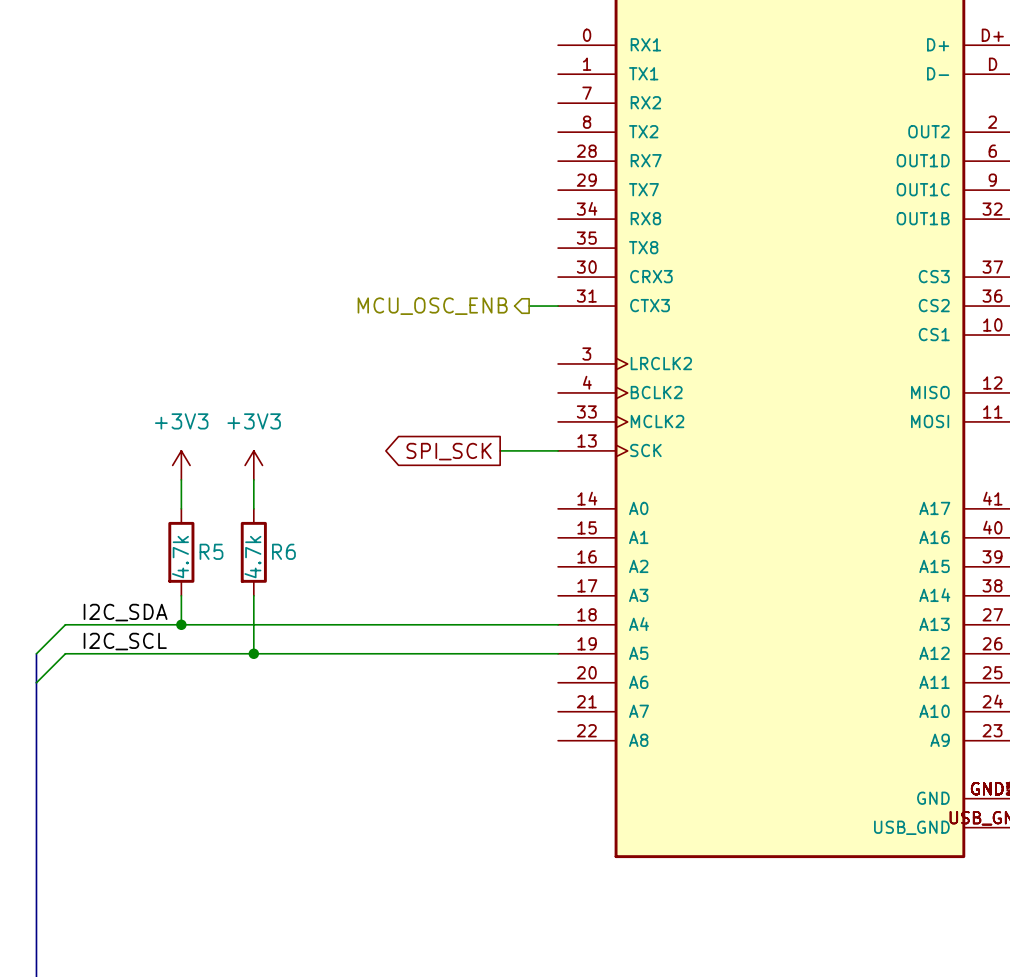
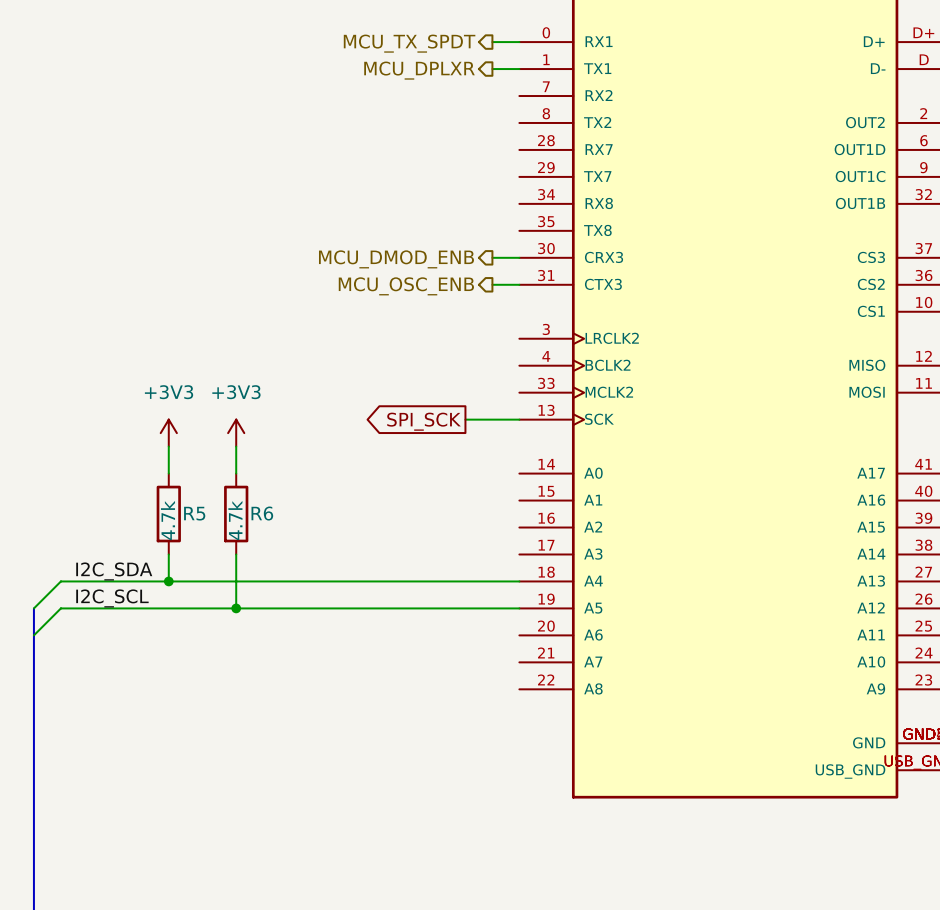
hierarchical label: none -> MCU_TX_SPDT (409, 43)
wire: none -> (492, 42) (519, 42)
hierarchical label: none -> MCU_DPLXR (419, 70)
wire: none -> (492, 69) (519, 69)
hierarchical label: none -> MCU_DMOD_ENB (396, 259)
wire: none -> (492, 257) (519, 257)

